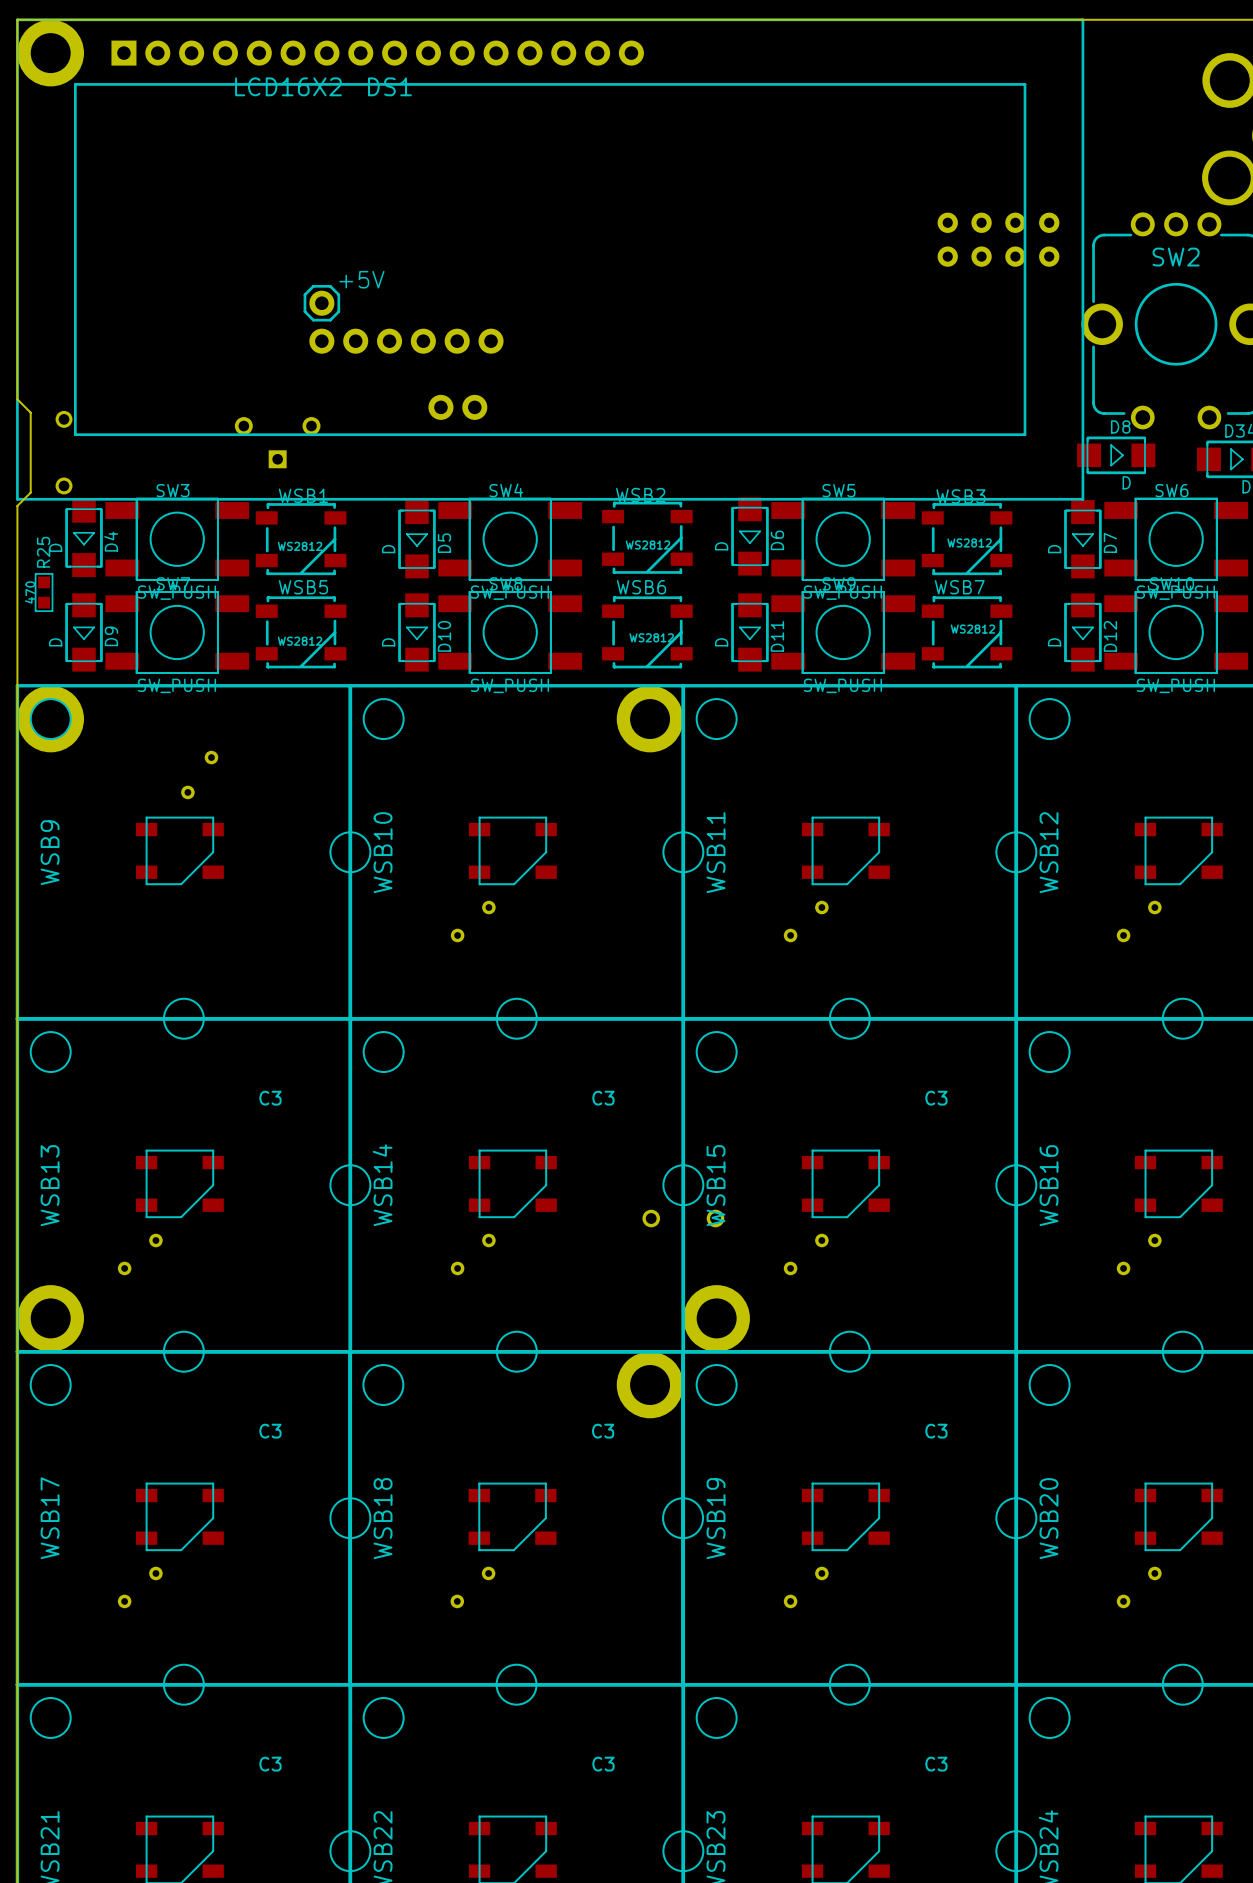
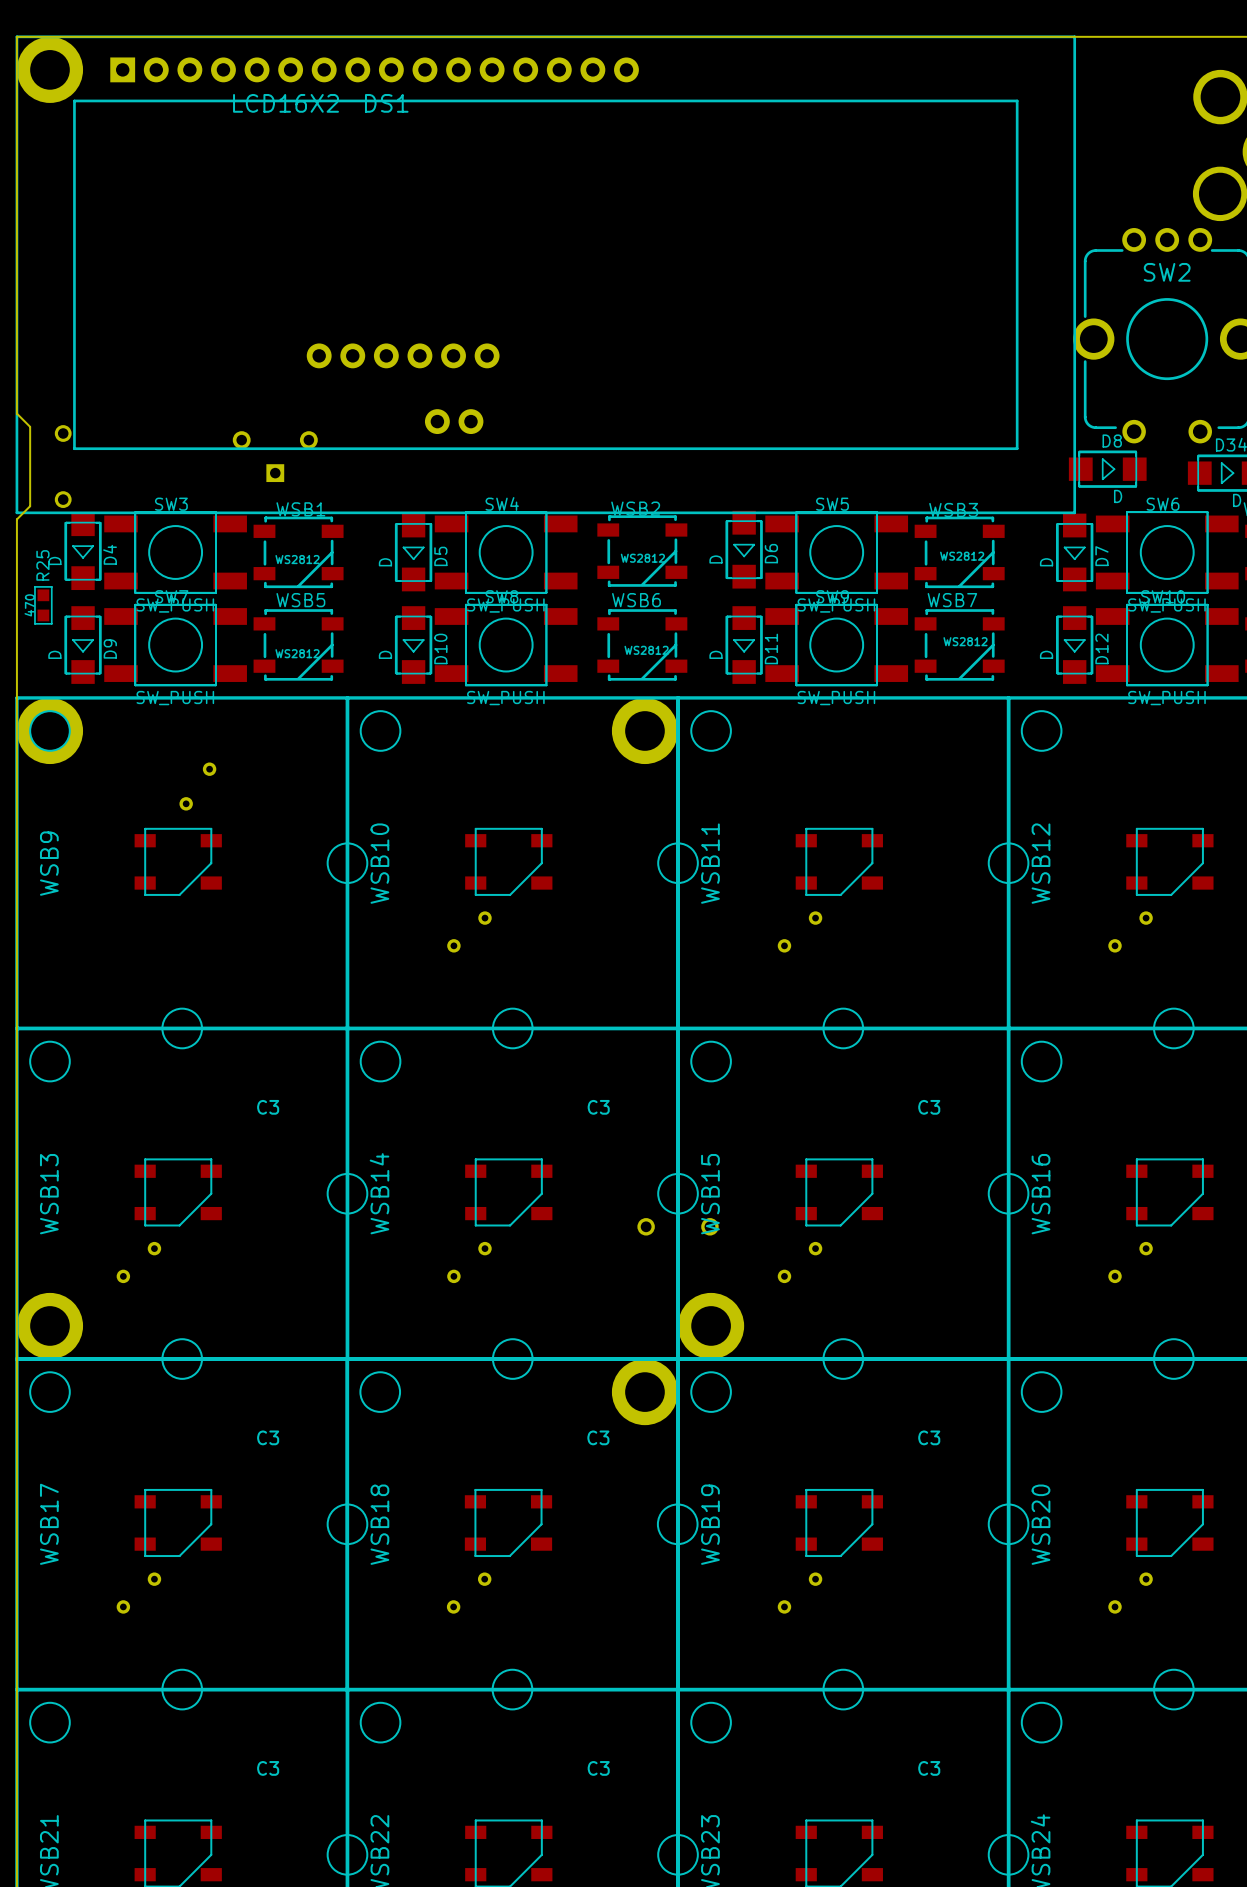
part: (964, 239) -> none
part: (1032, 239) -> none
+5V: (321, 303) -> none

